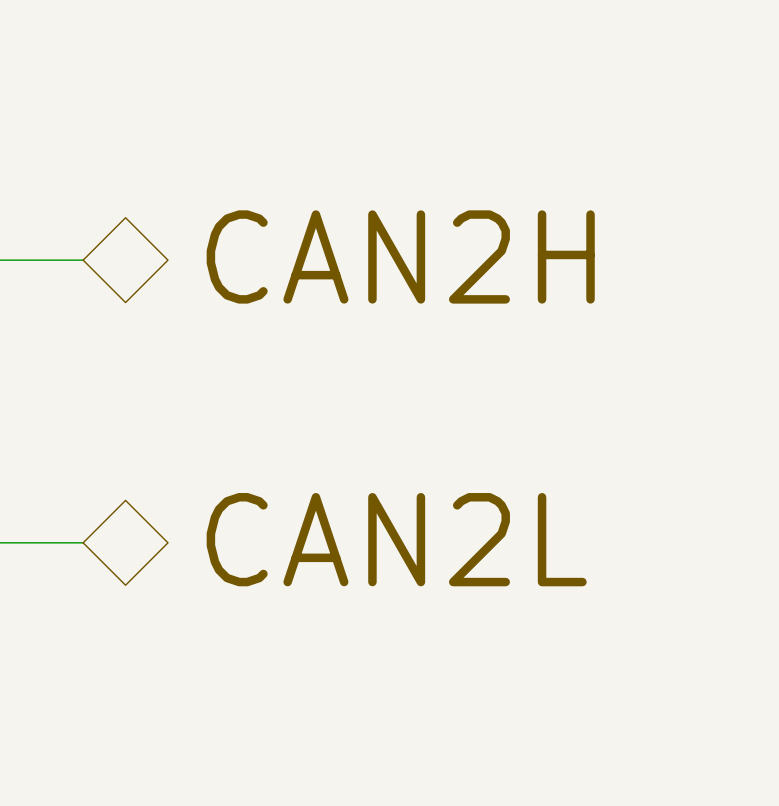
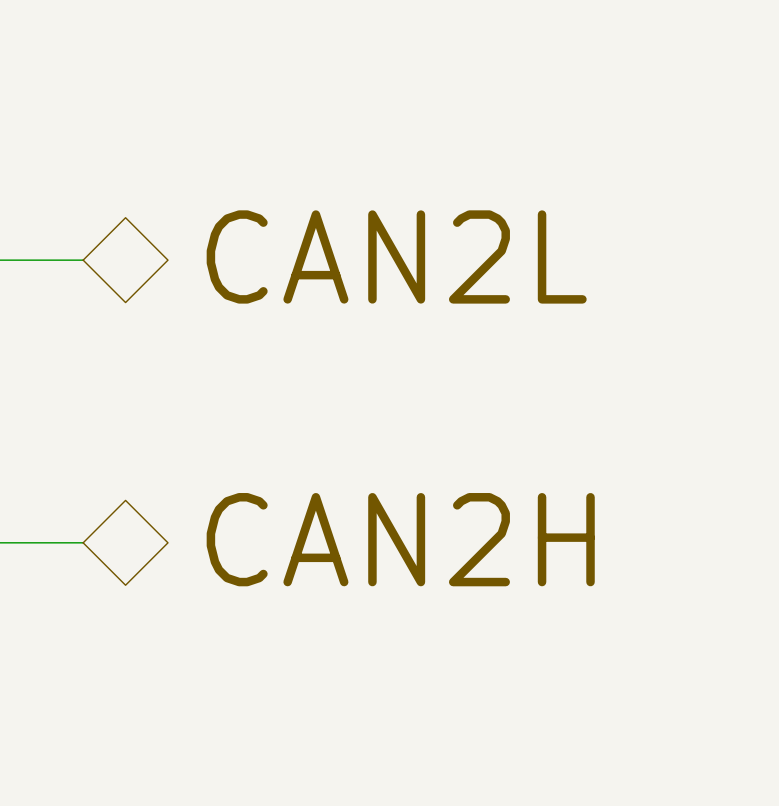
hierarchical label: CAN2H (400, 256) -> CAN2L (396, 256)
hierarchical label: CAN2L (396, 539) -> CAN2H (400, 539)

